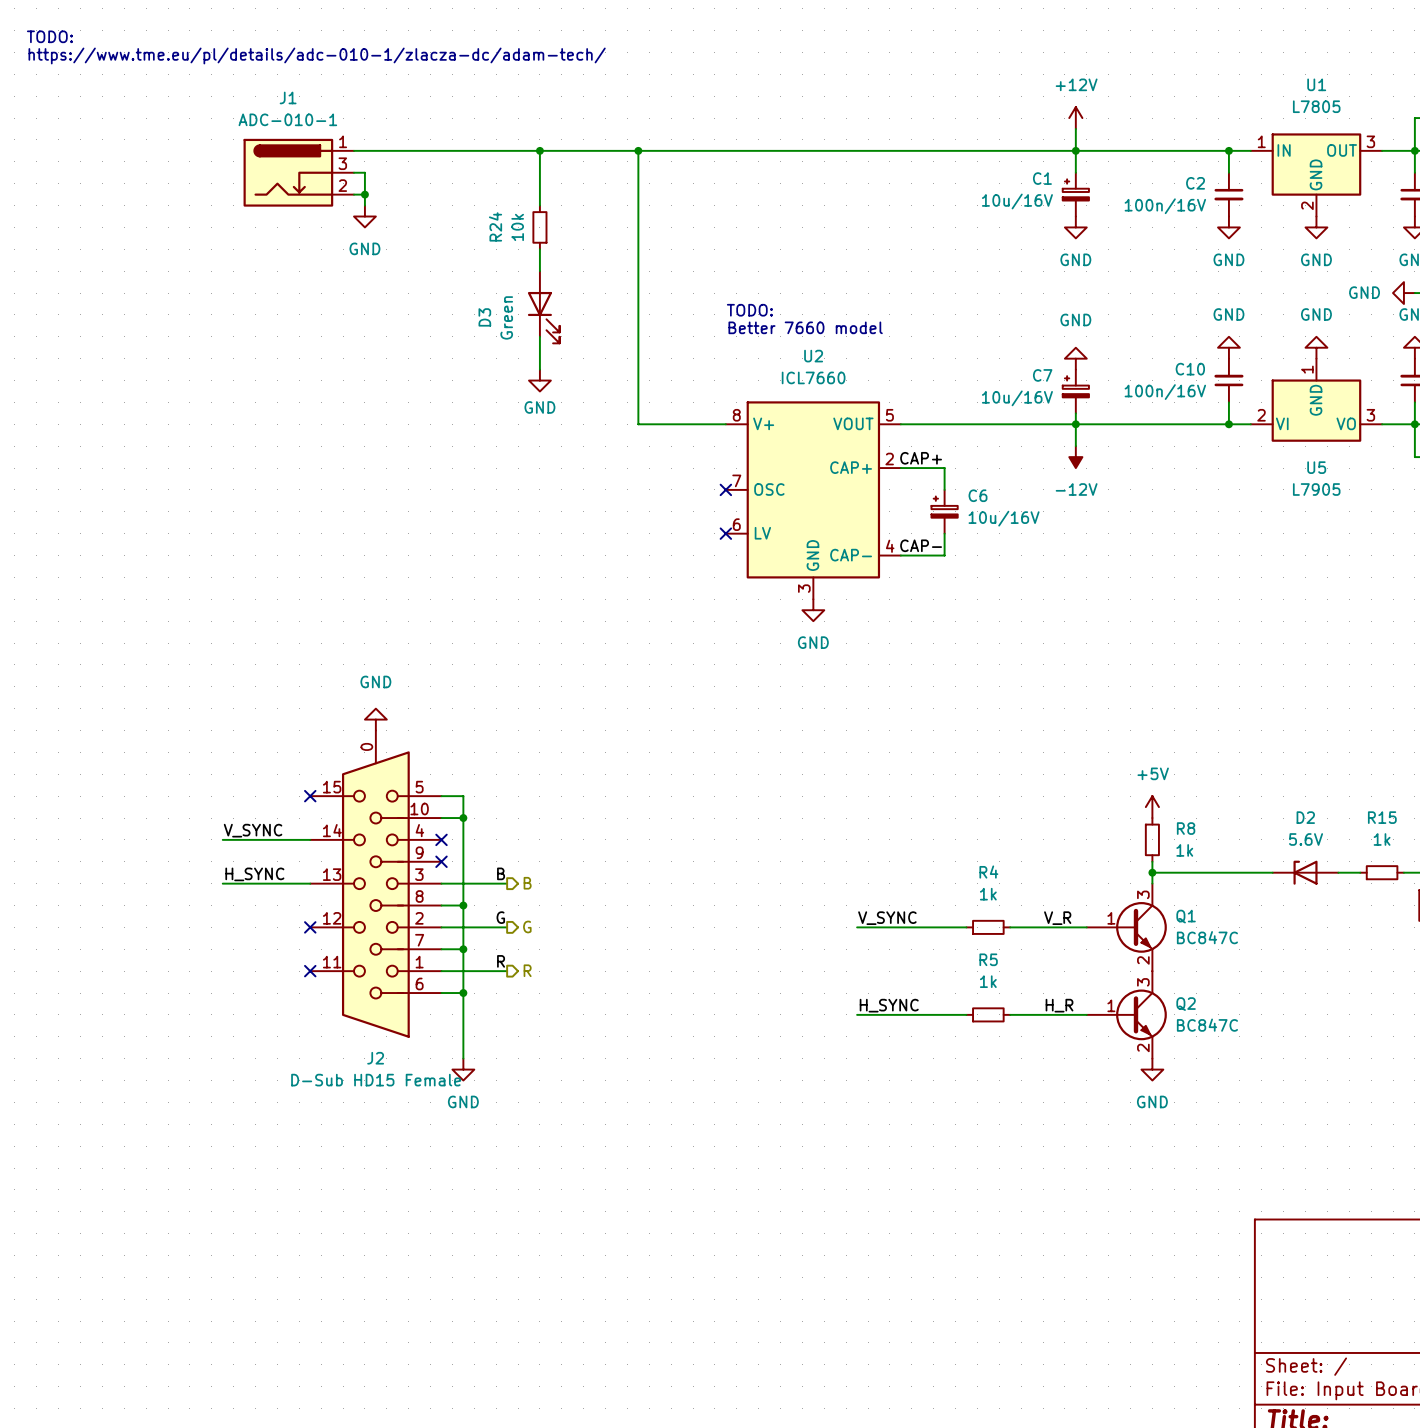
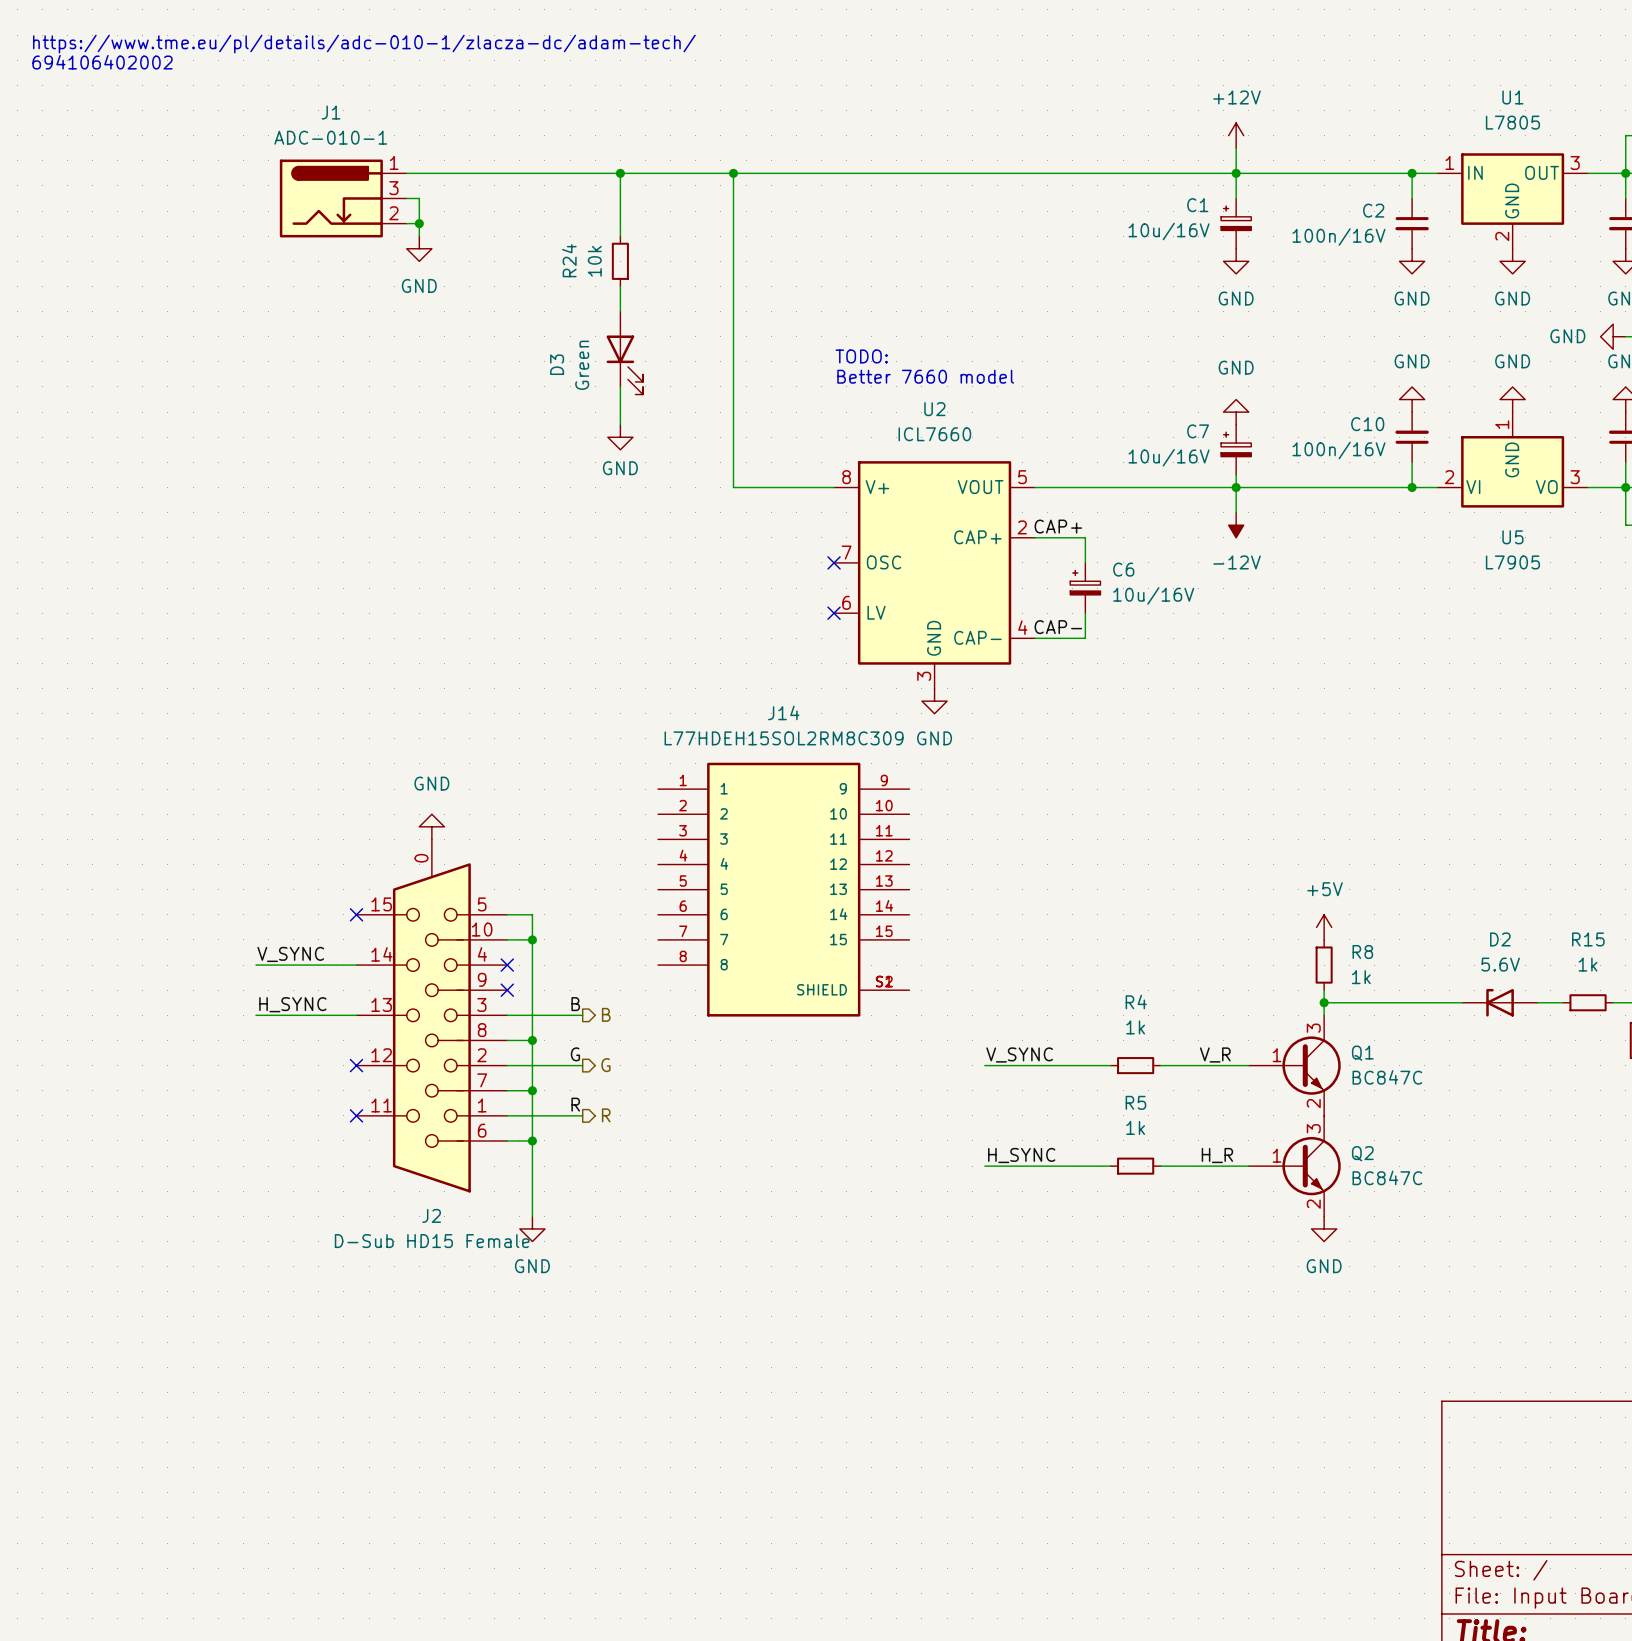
text: TODO: (49, 36) -> https://www.tme.eu/pl/details/adc-010-1/zlacza-dc/adam-tech/ (364, 44)
text: https://www.tme.eu/pl/details/adc-010-1/zlacza-dc/adam-tech/ (317, 55) -> 694106402002 (102, 62)
J14: none -> L77HDEH15SOL2RM8C309 (783, 889)

